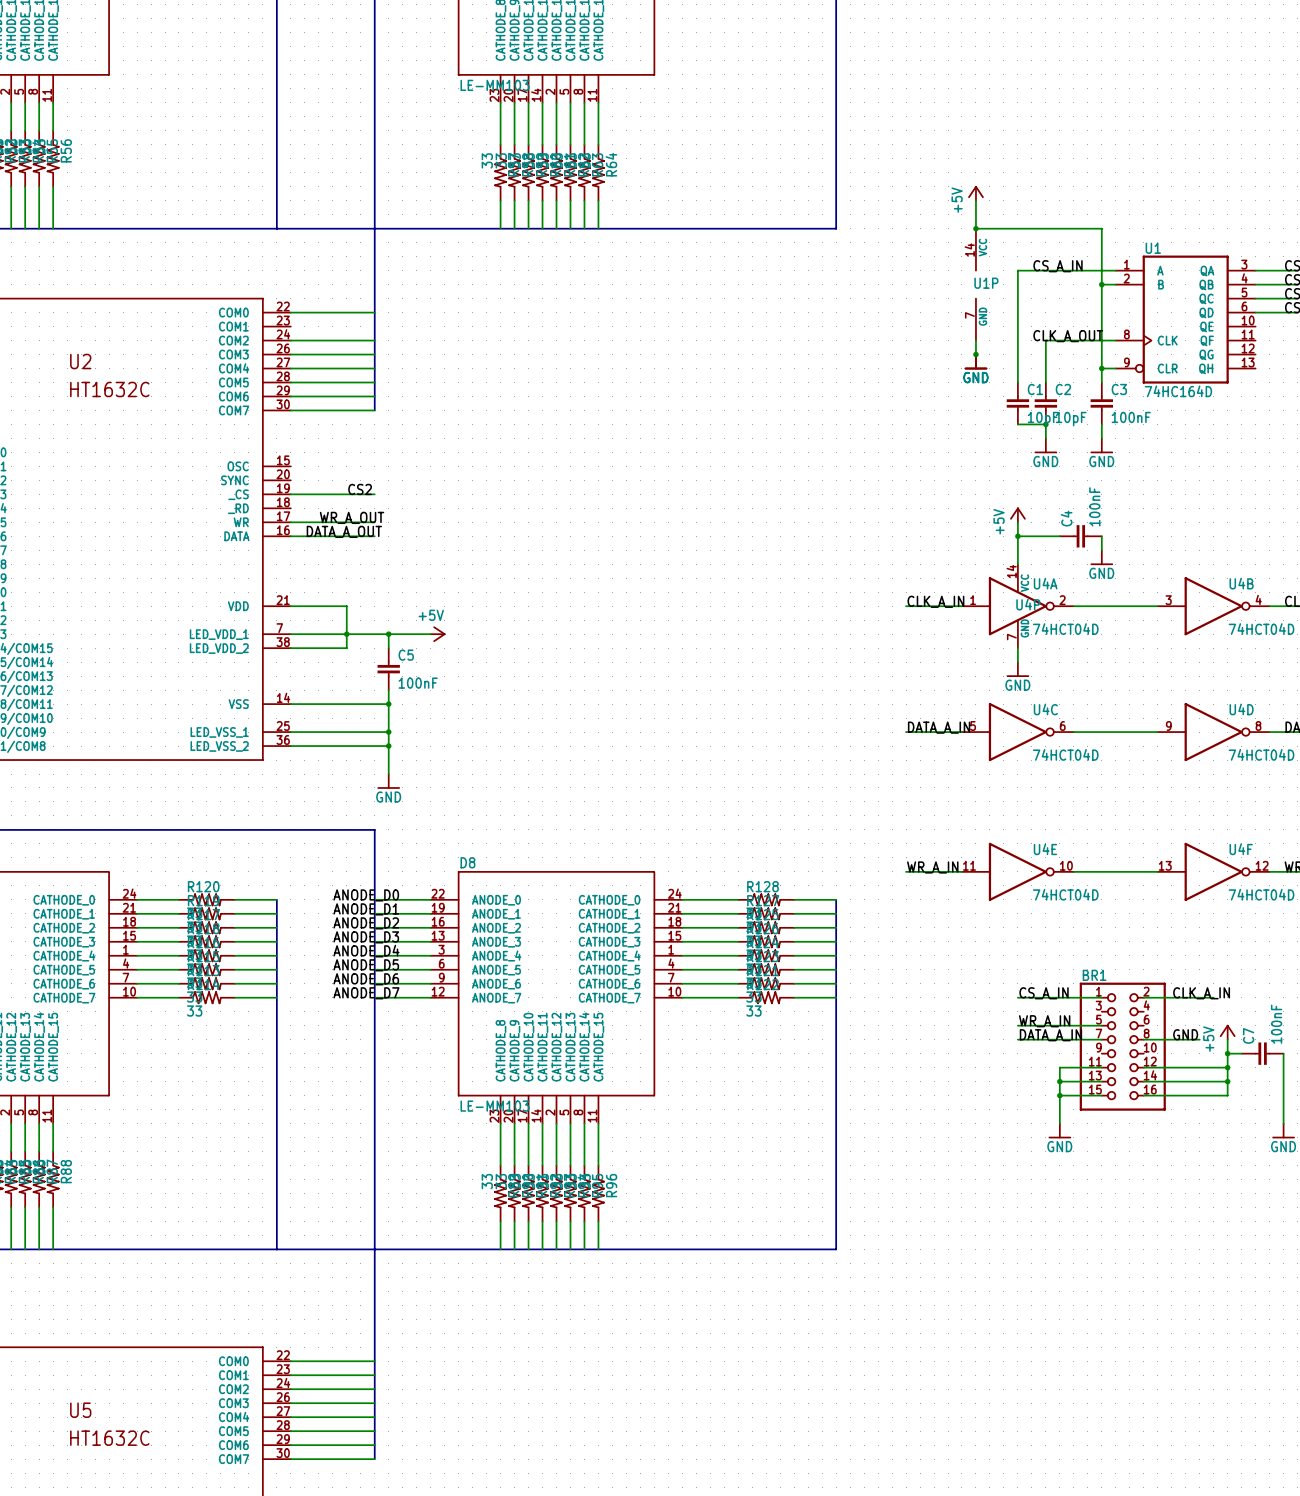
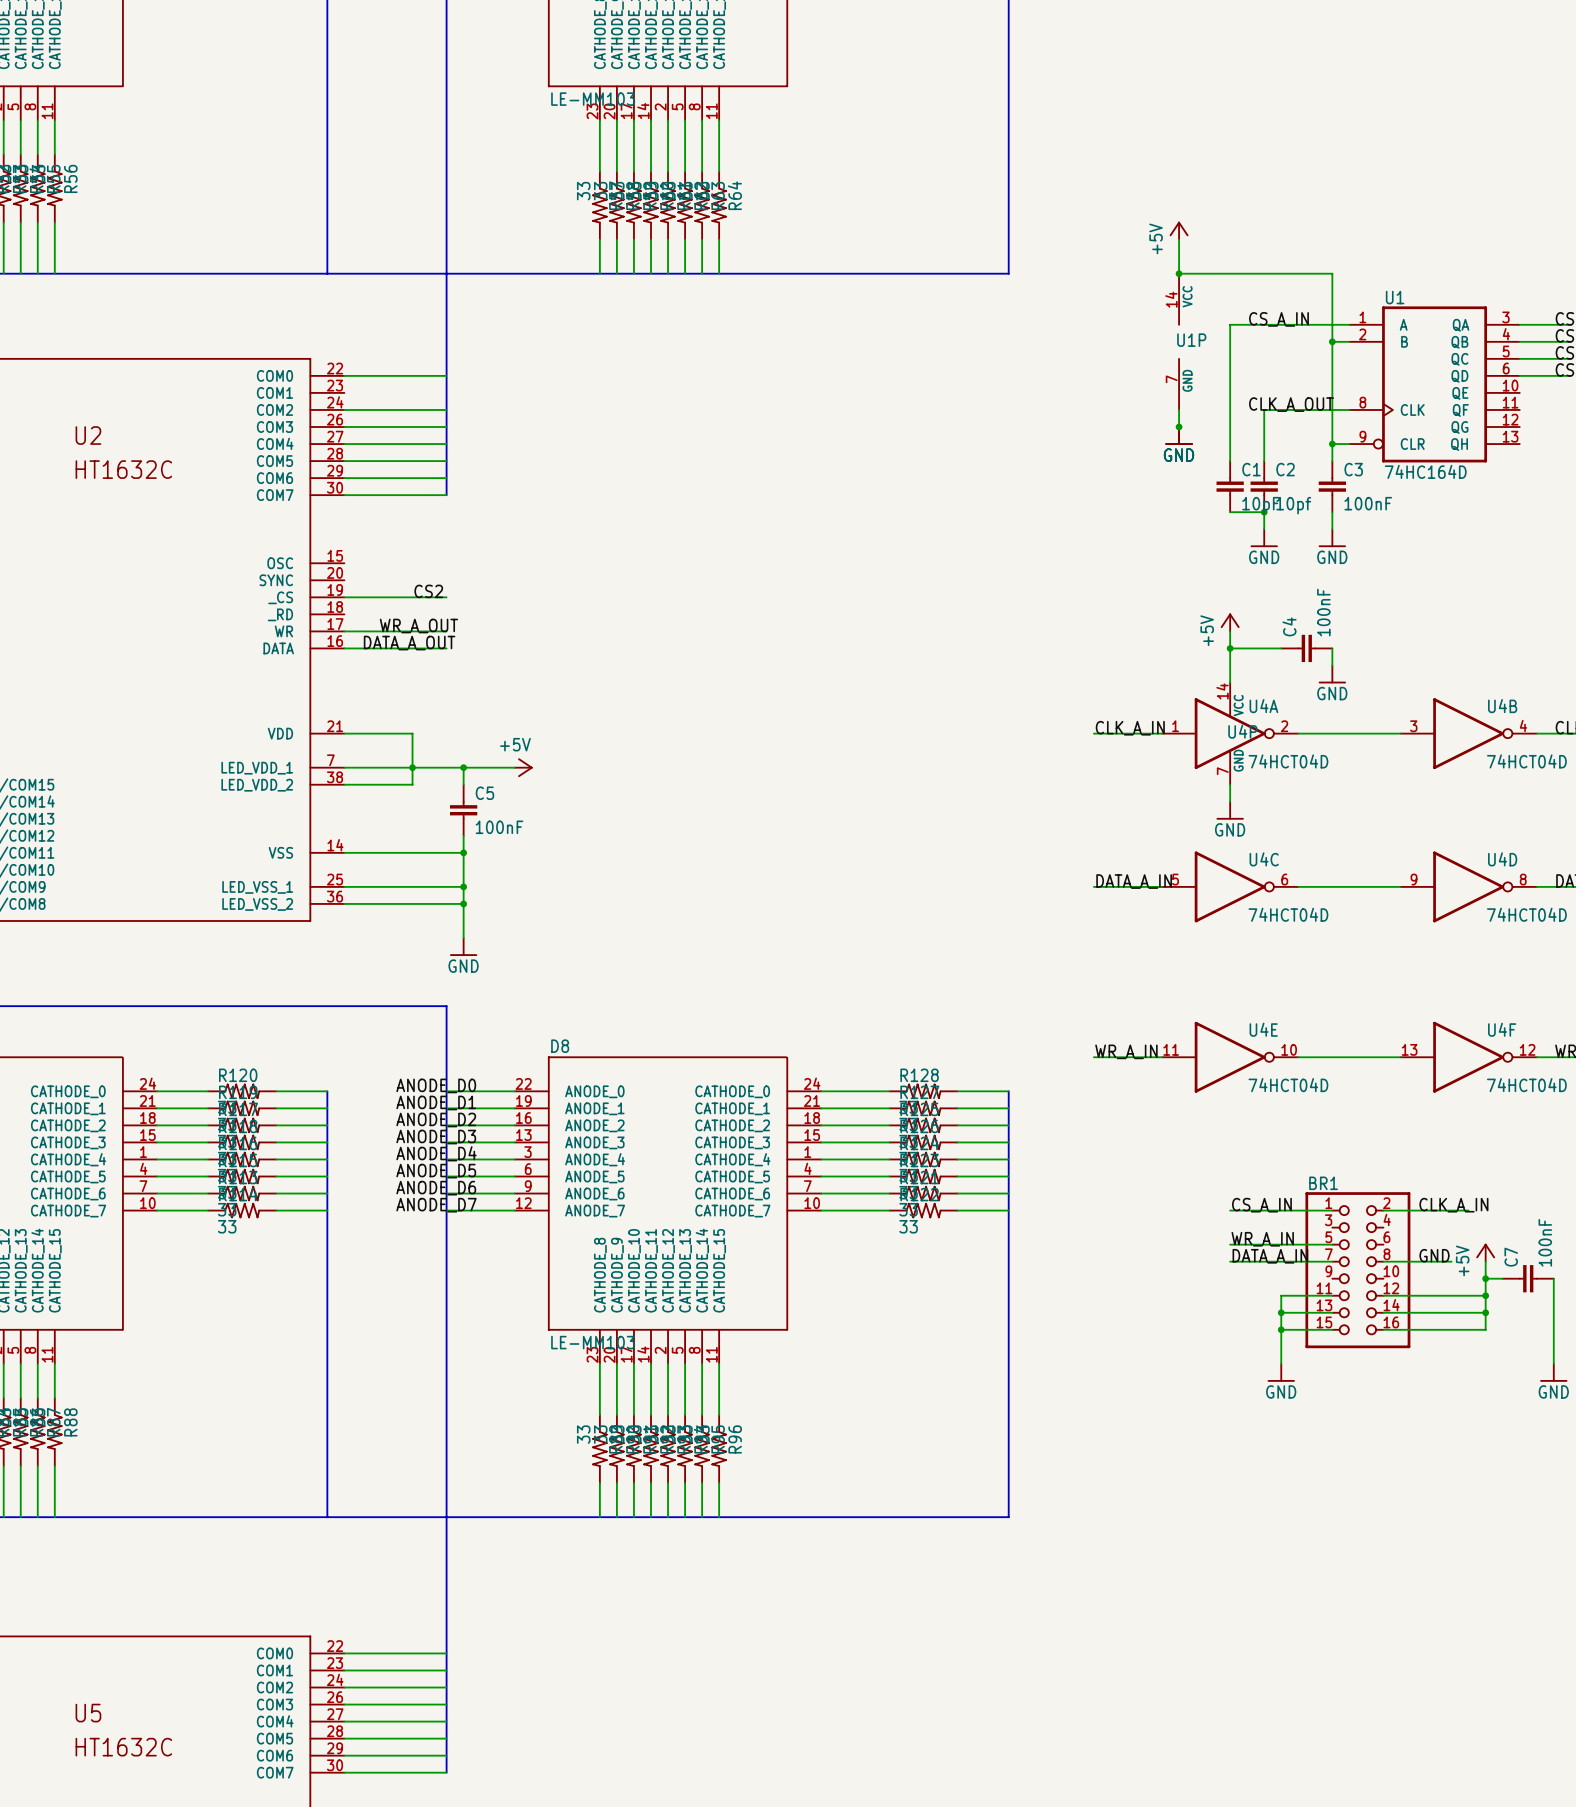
C2 value: 10pF (1071, 419) -> 10pf (1293, 505)

